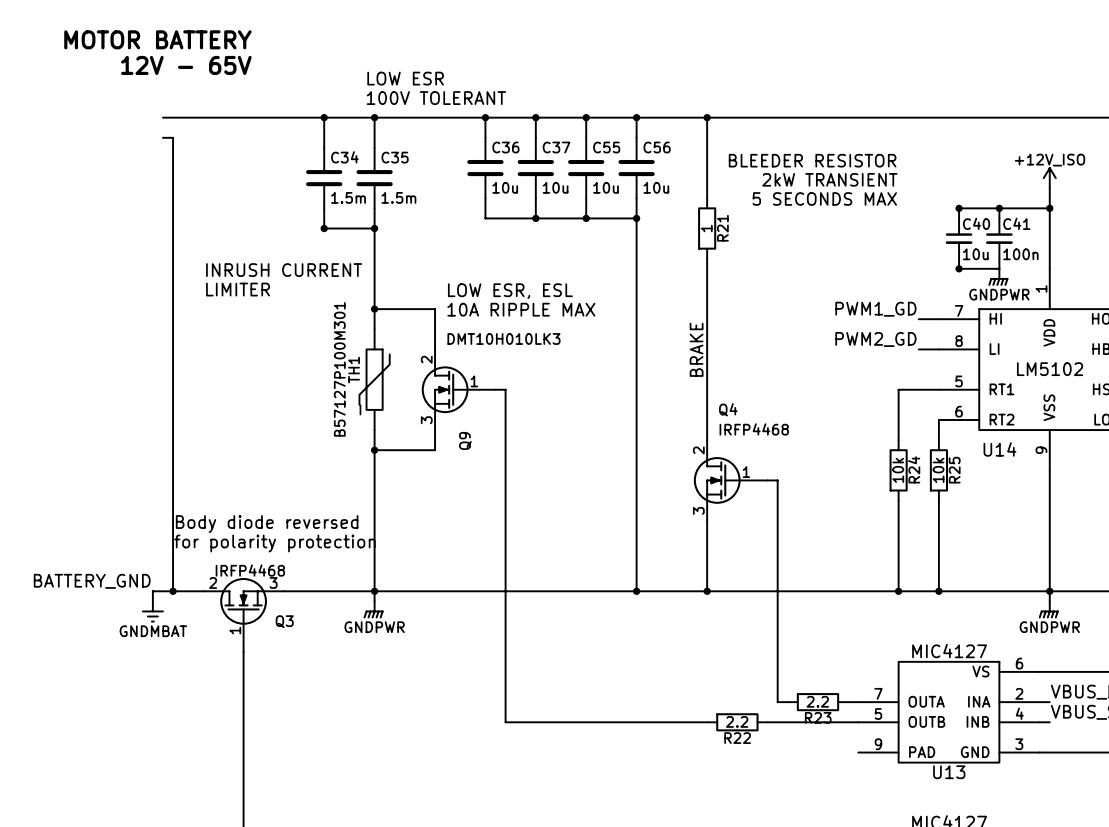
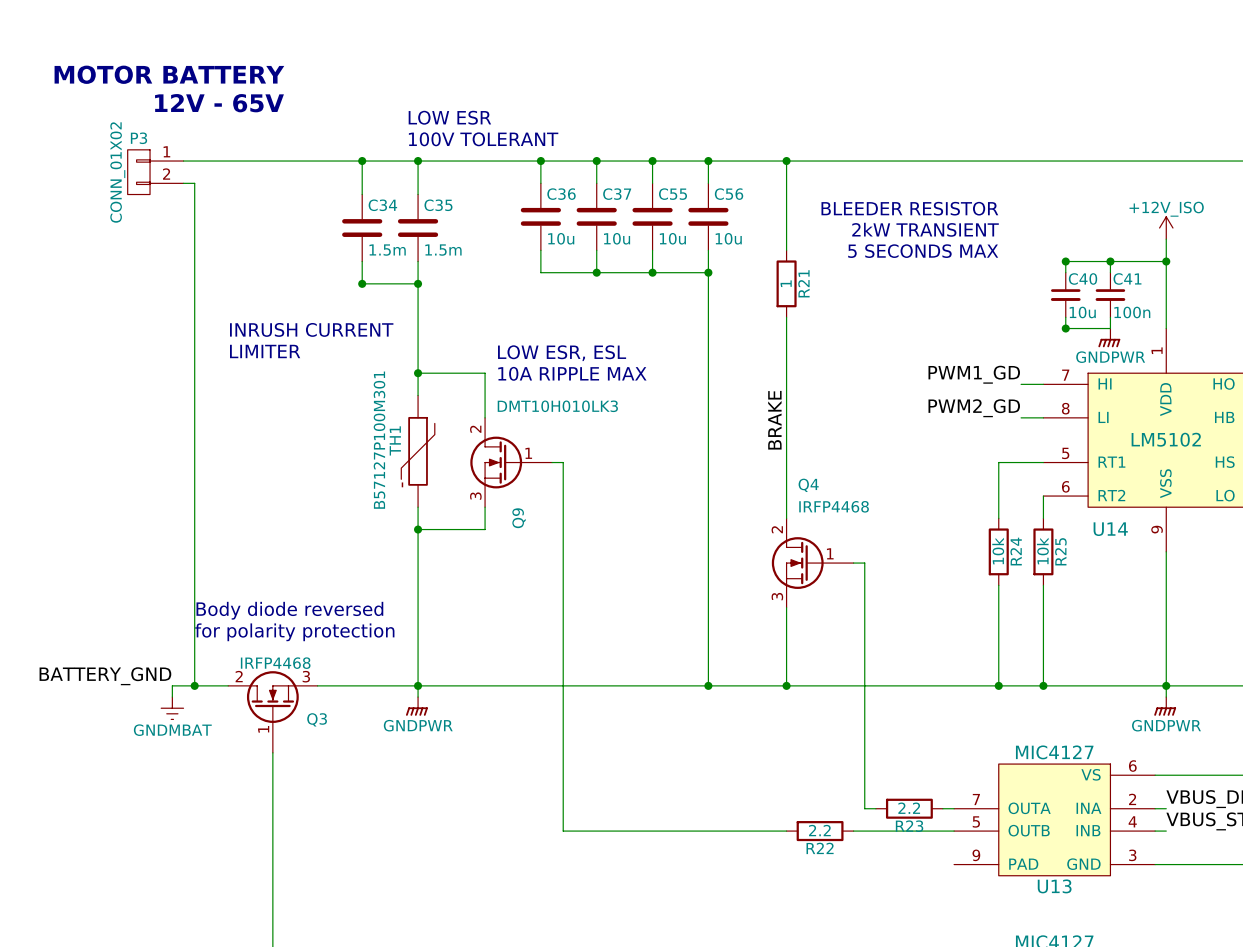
P3: none -> CONN_01X02 (155, 172)

